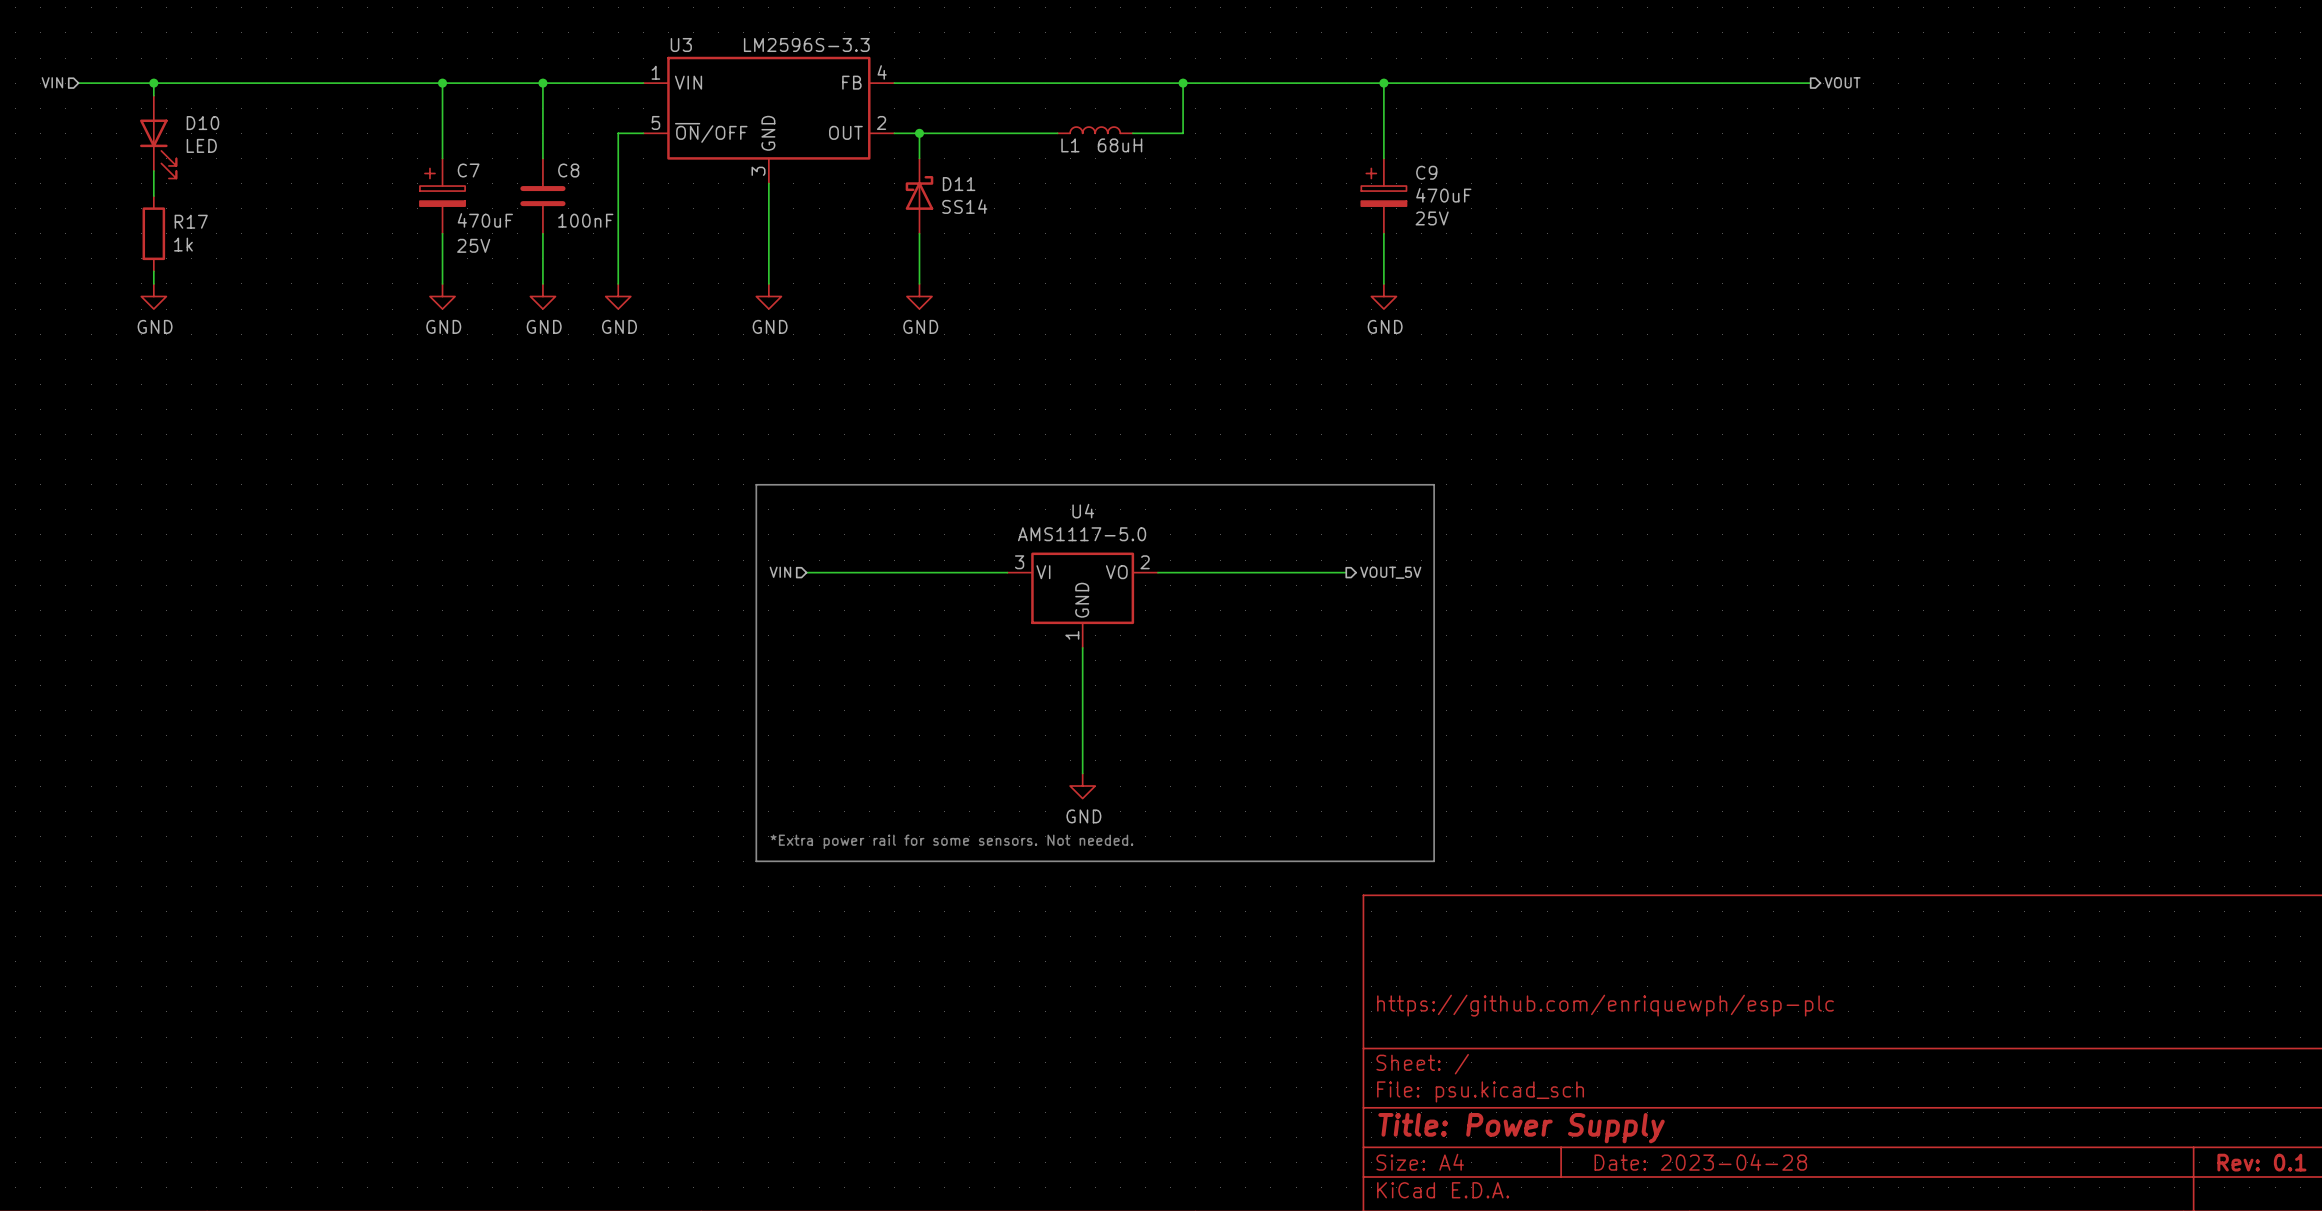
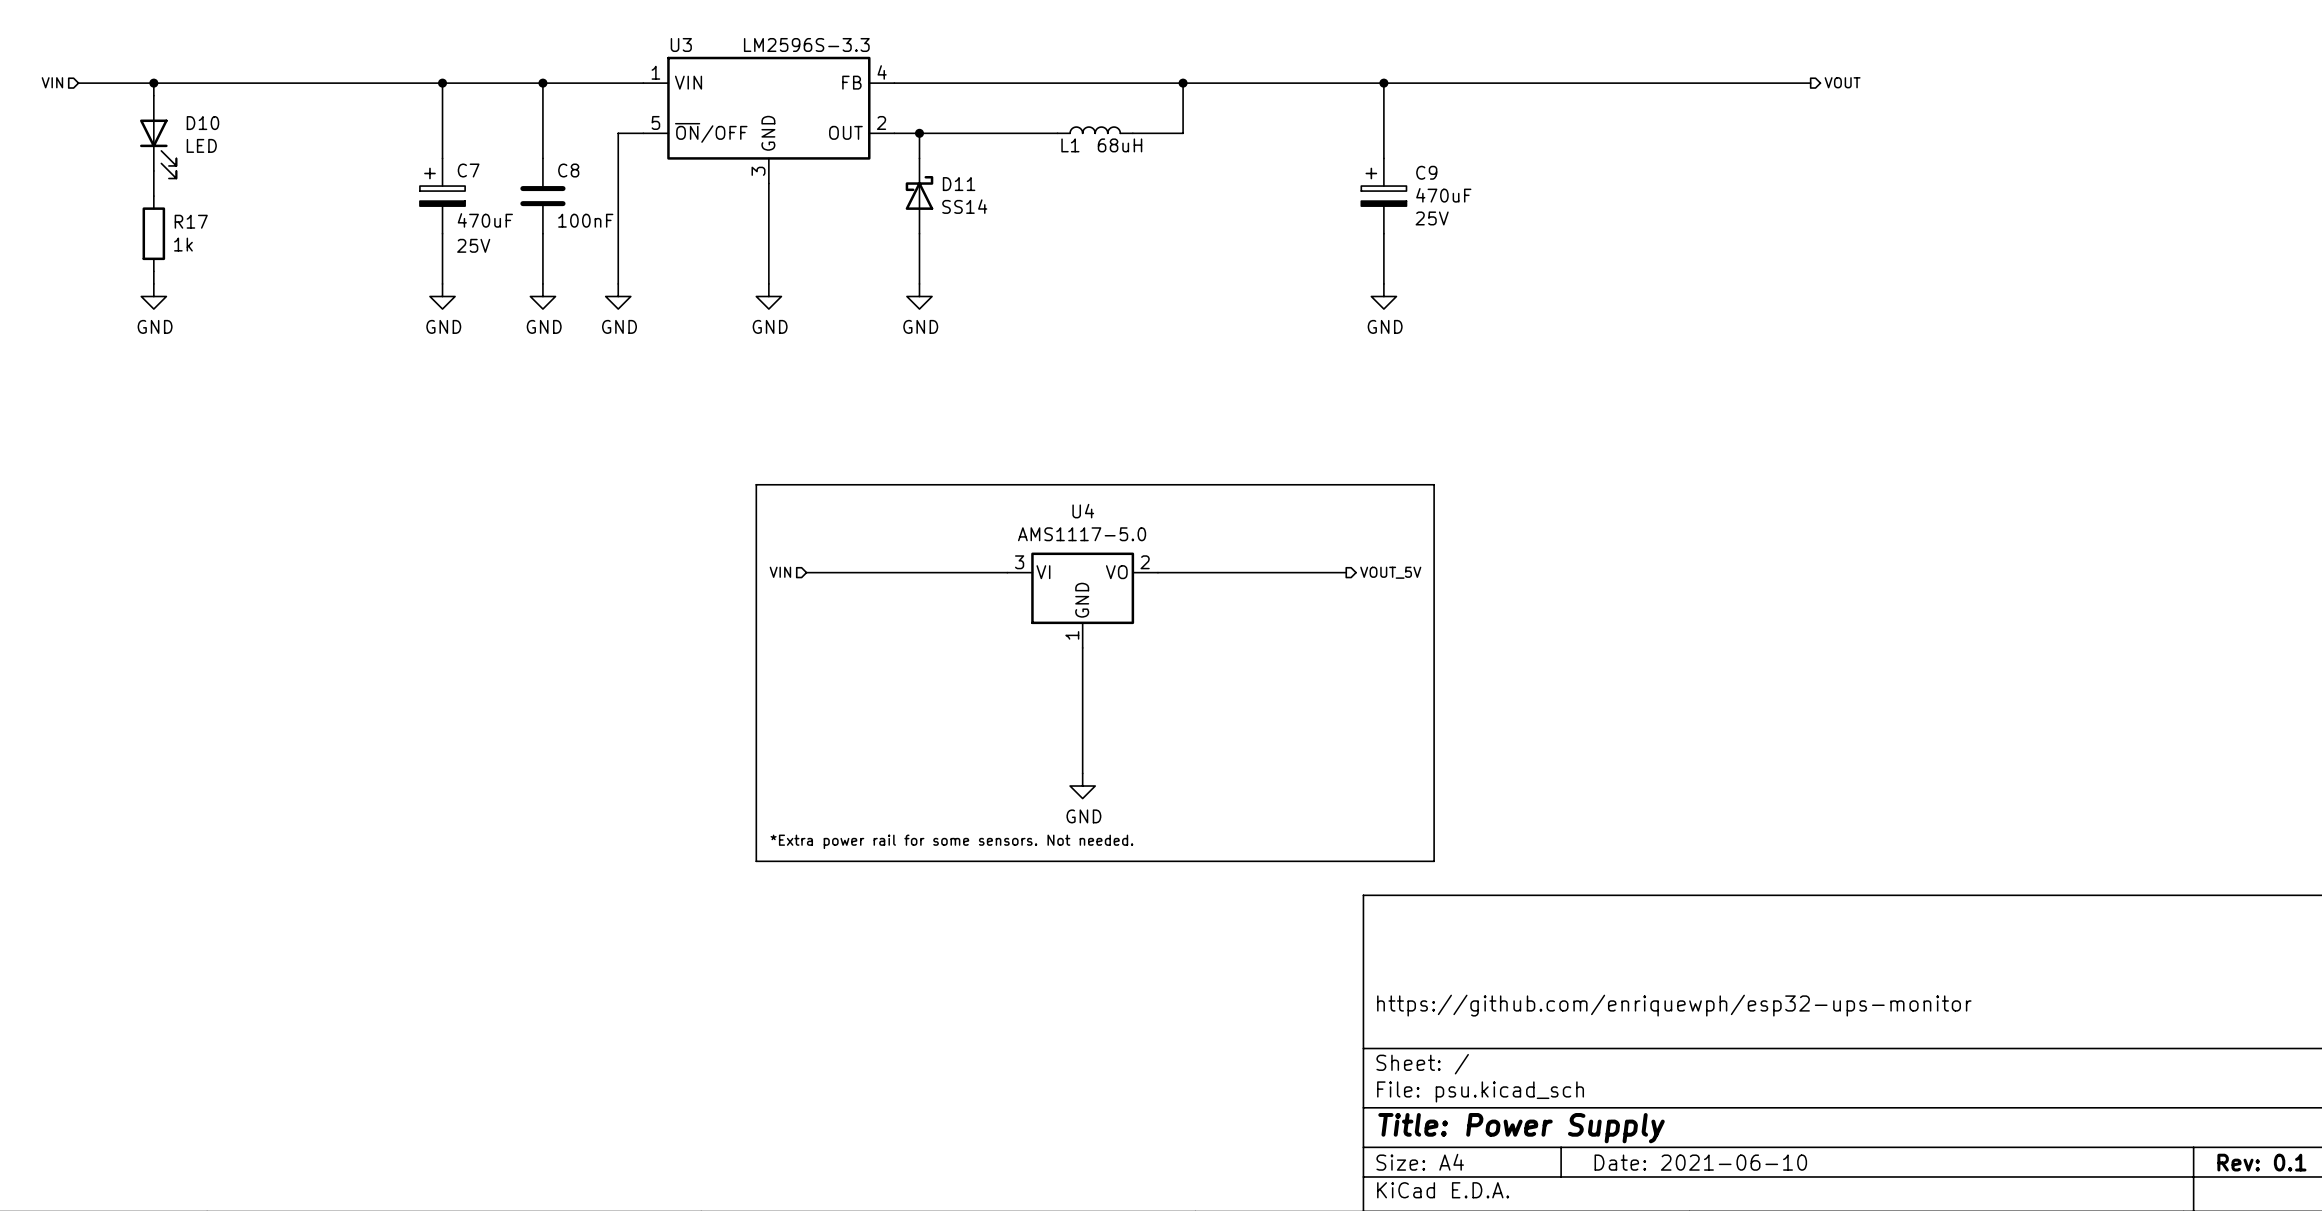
title block: https://github.com/enriquewph/esp-plc (1605, 1005) -> https://github.com/enriquewph/esp32-ups-monitor (1674, 1005)
title block: Date: 2023-04-28 (1700, 1162) -> Date: 2021-06-10 (1700, 1162)

